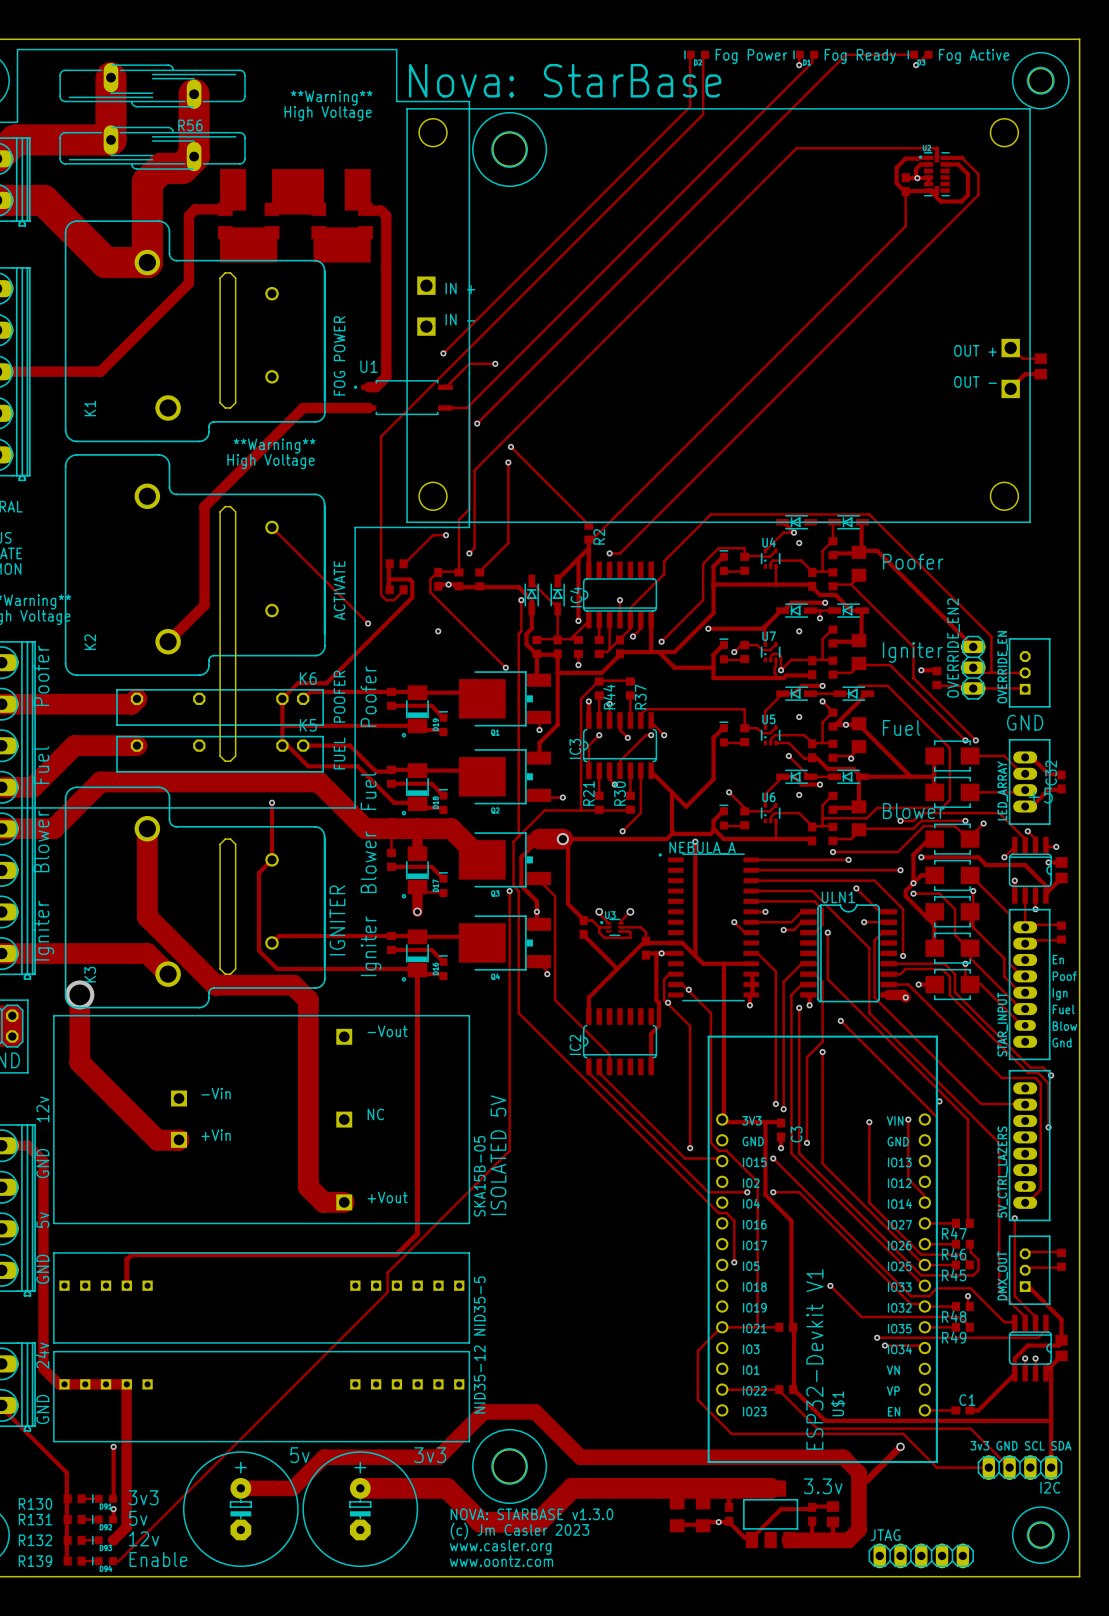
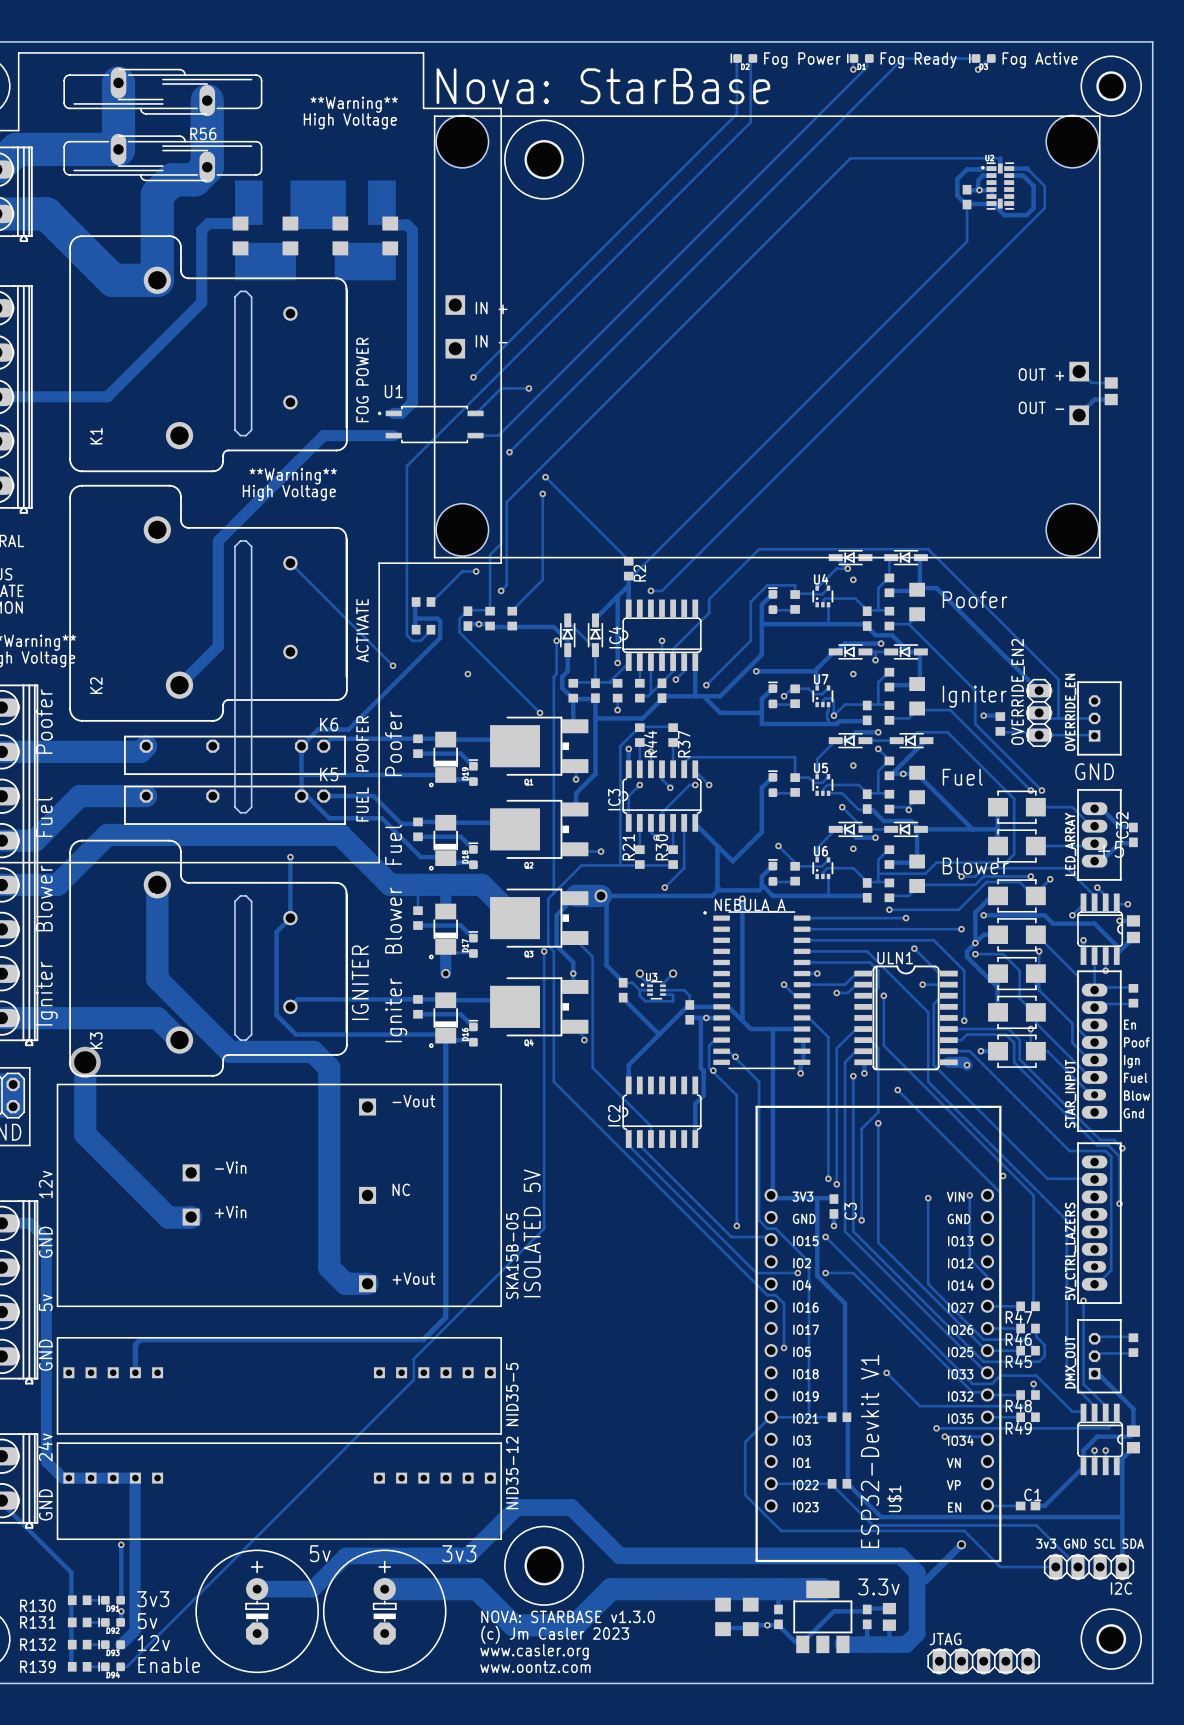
part footprint: [406, 108, 1031, 523] -> [434, 115, 1101, 559]

